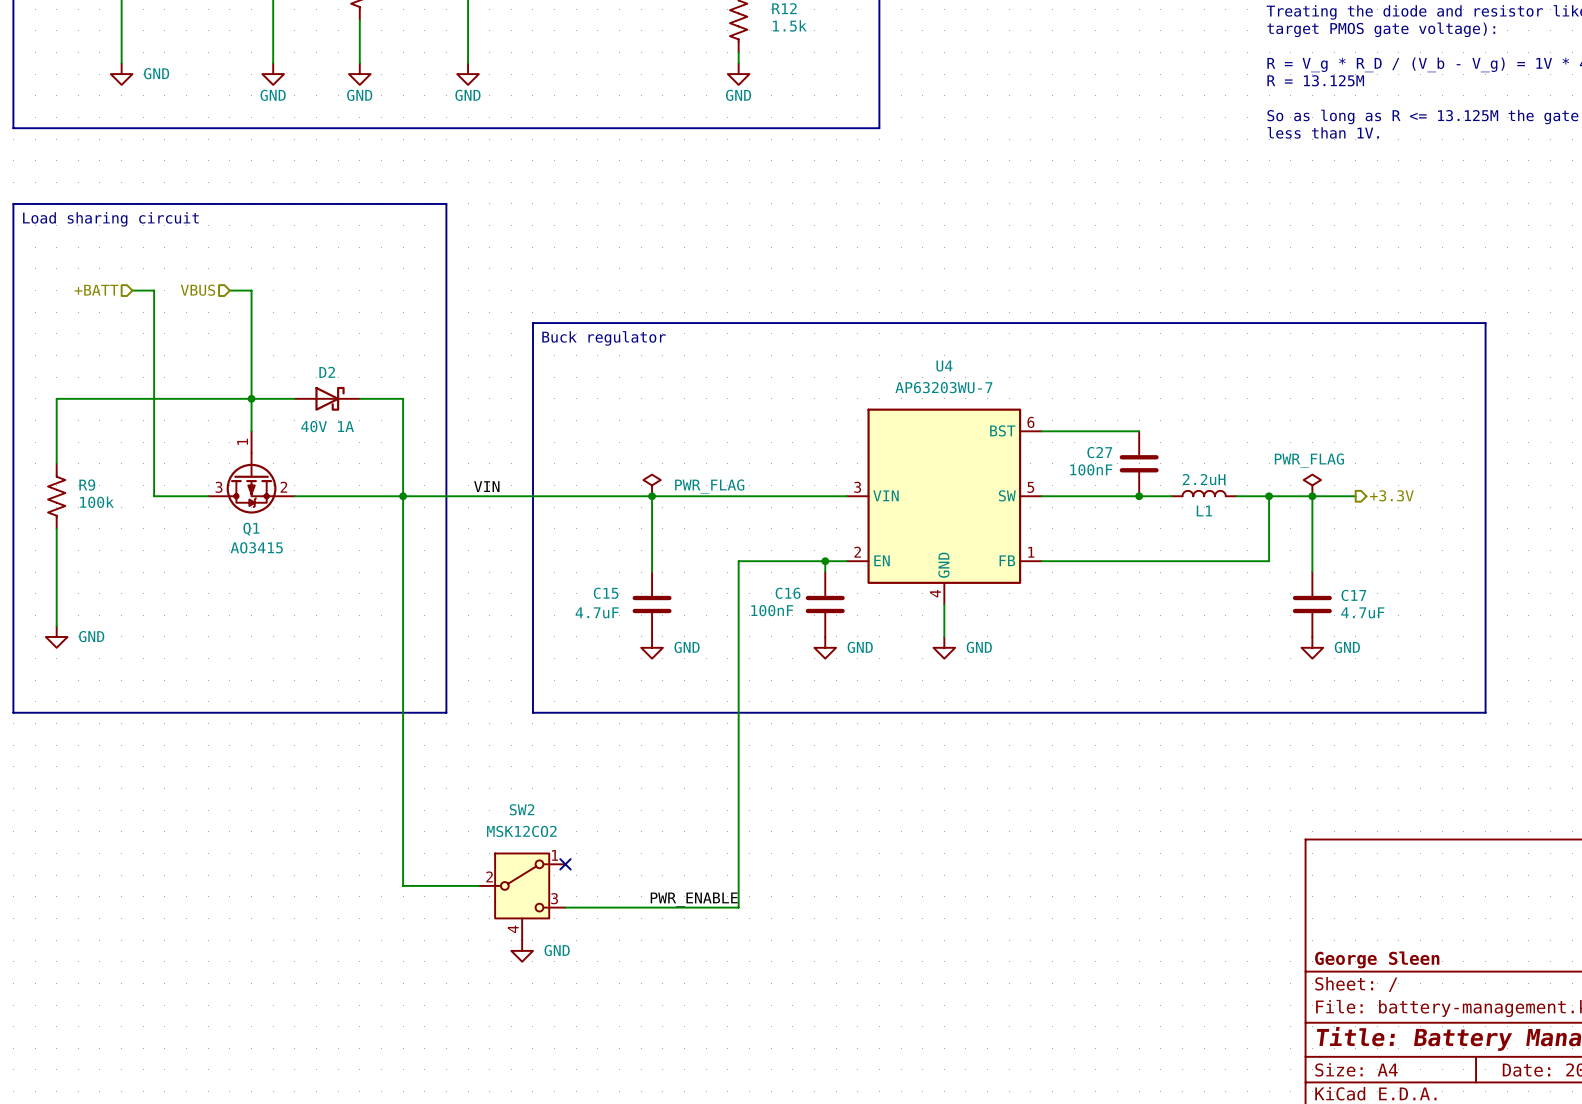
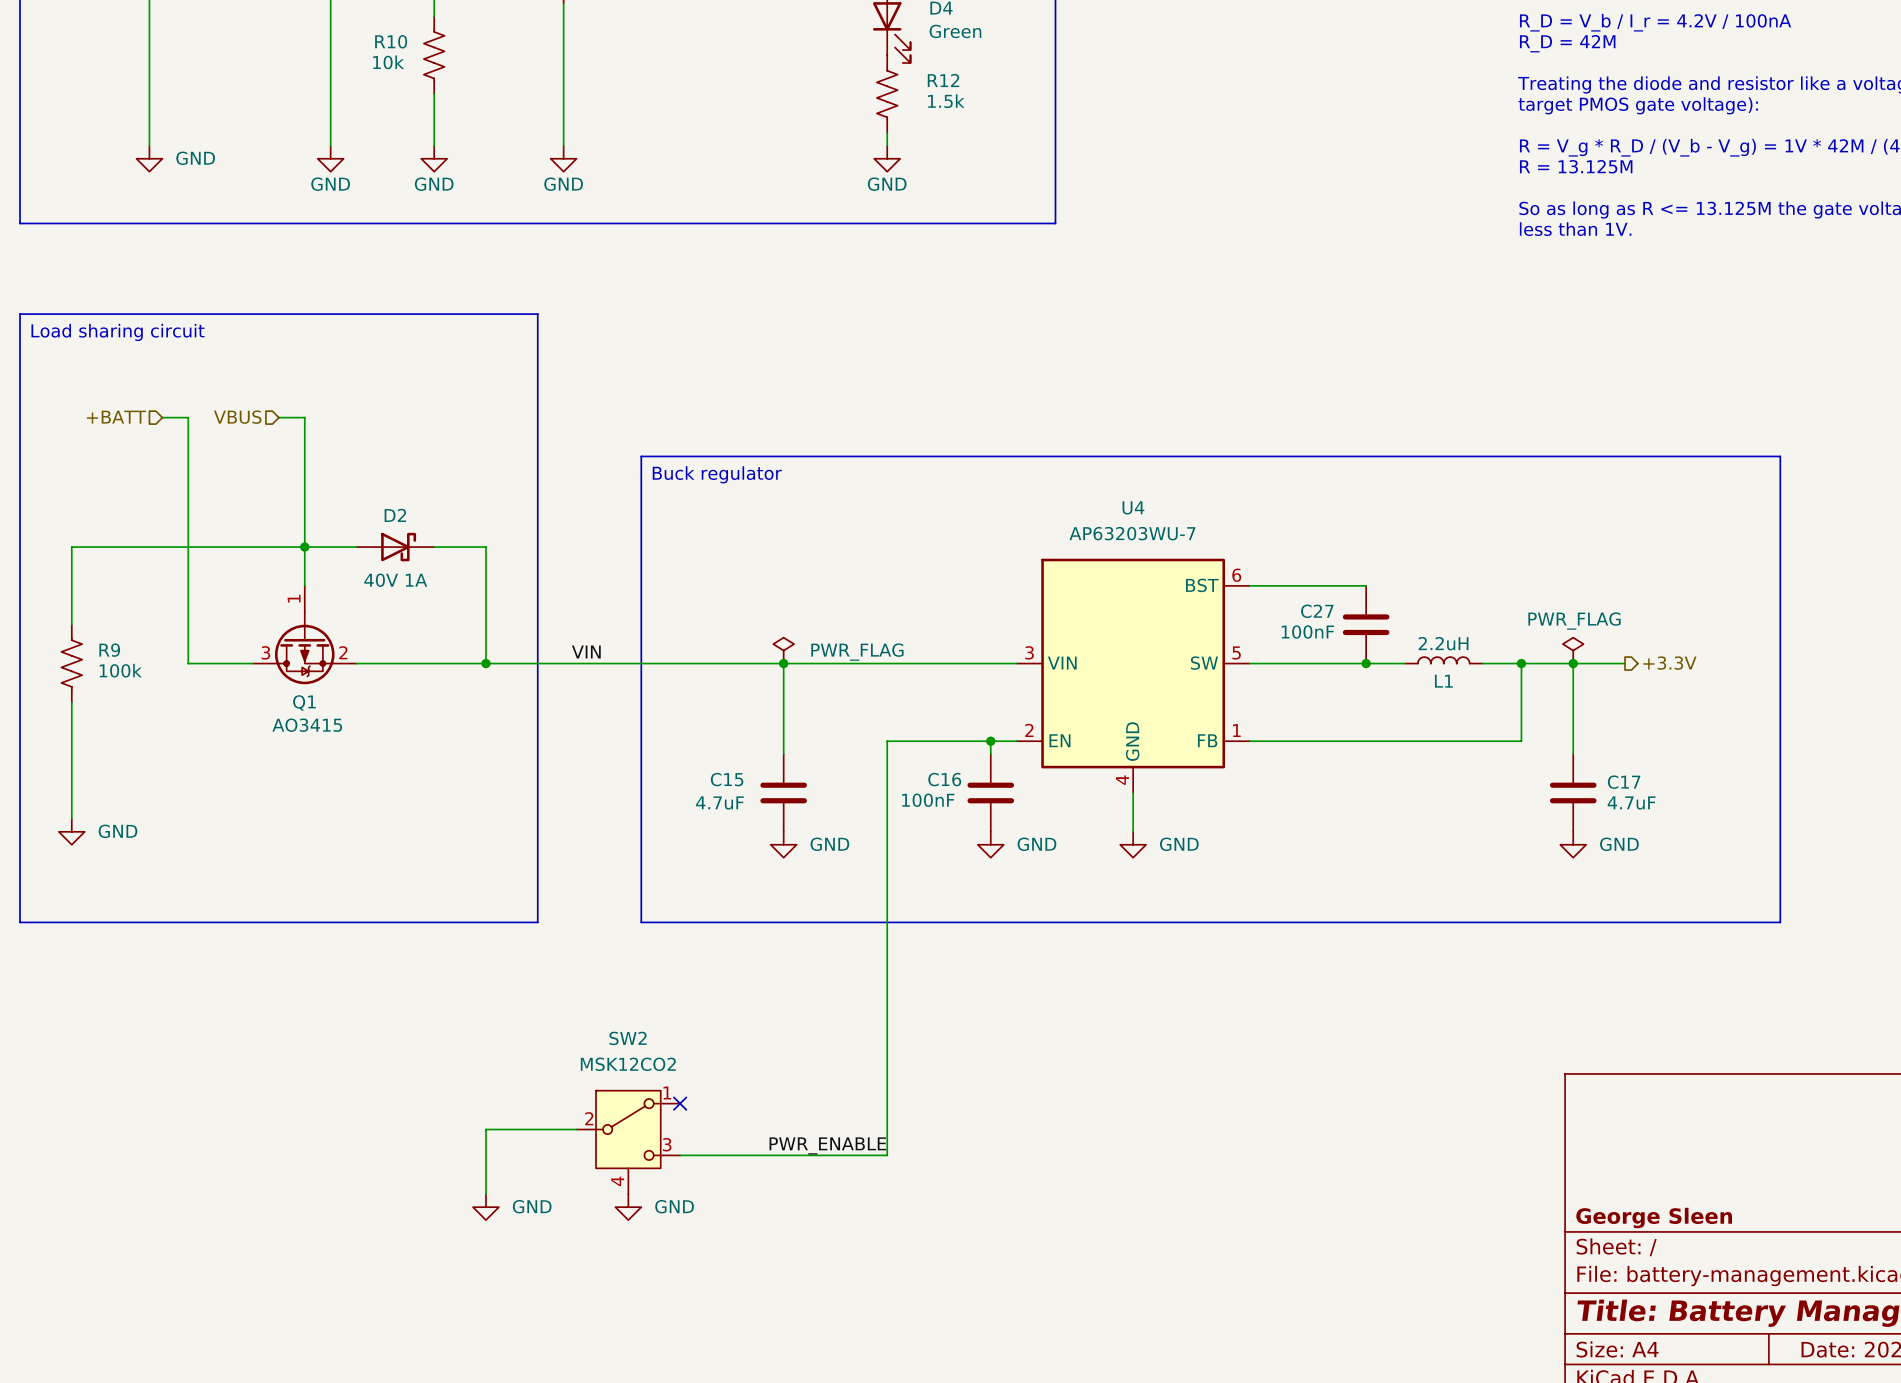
wire: (403, 496) (403, 885) -> (485, 1194) (485, 1129)
power symbol: none -> GND (485, 1207)

